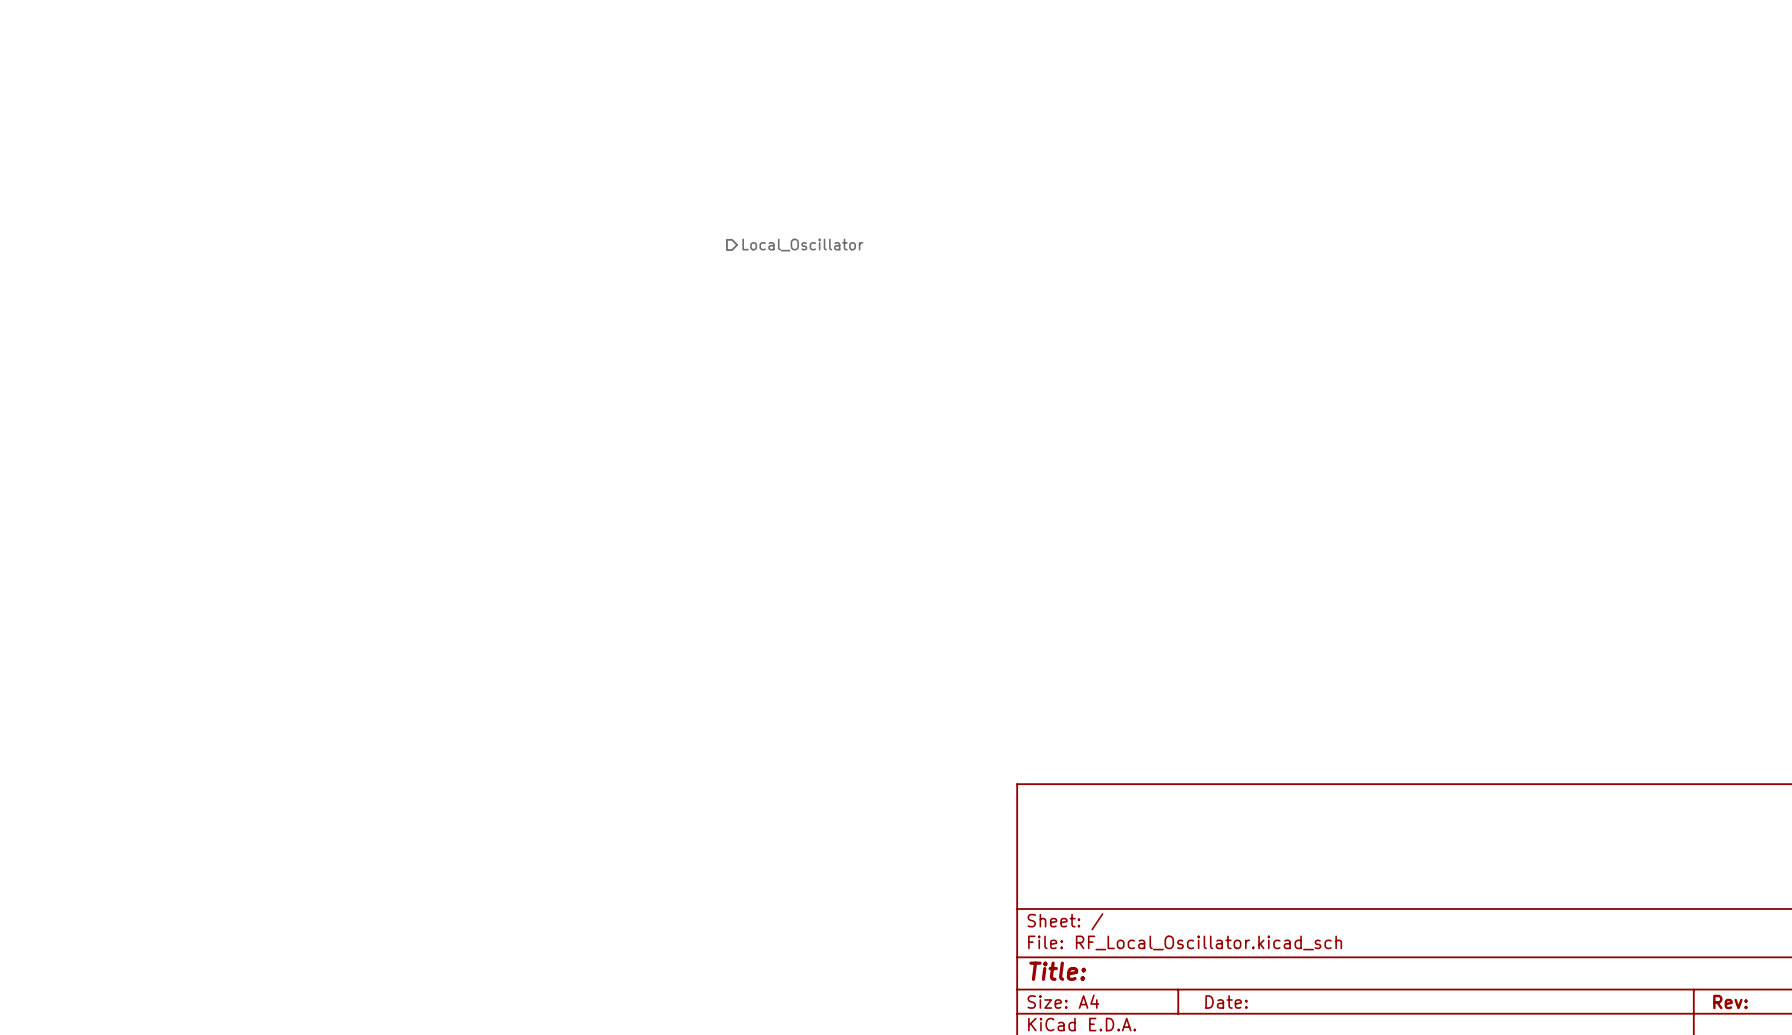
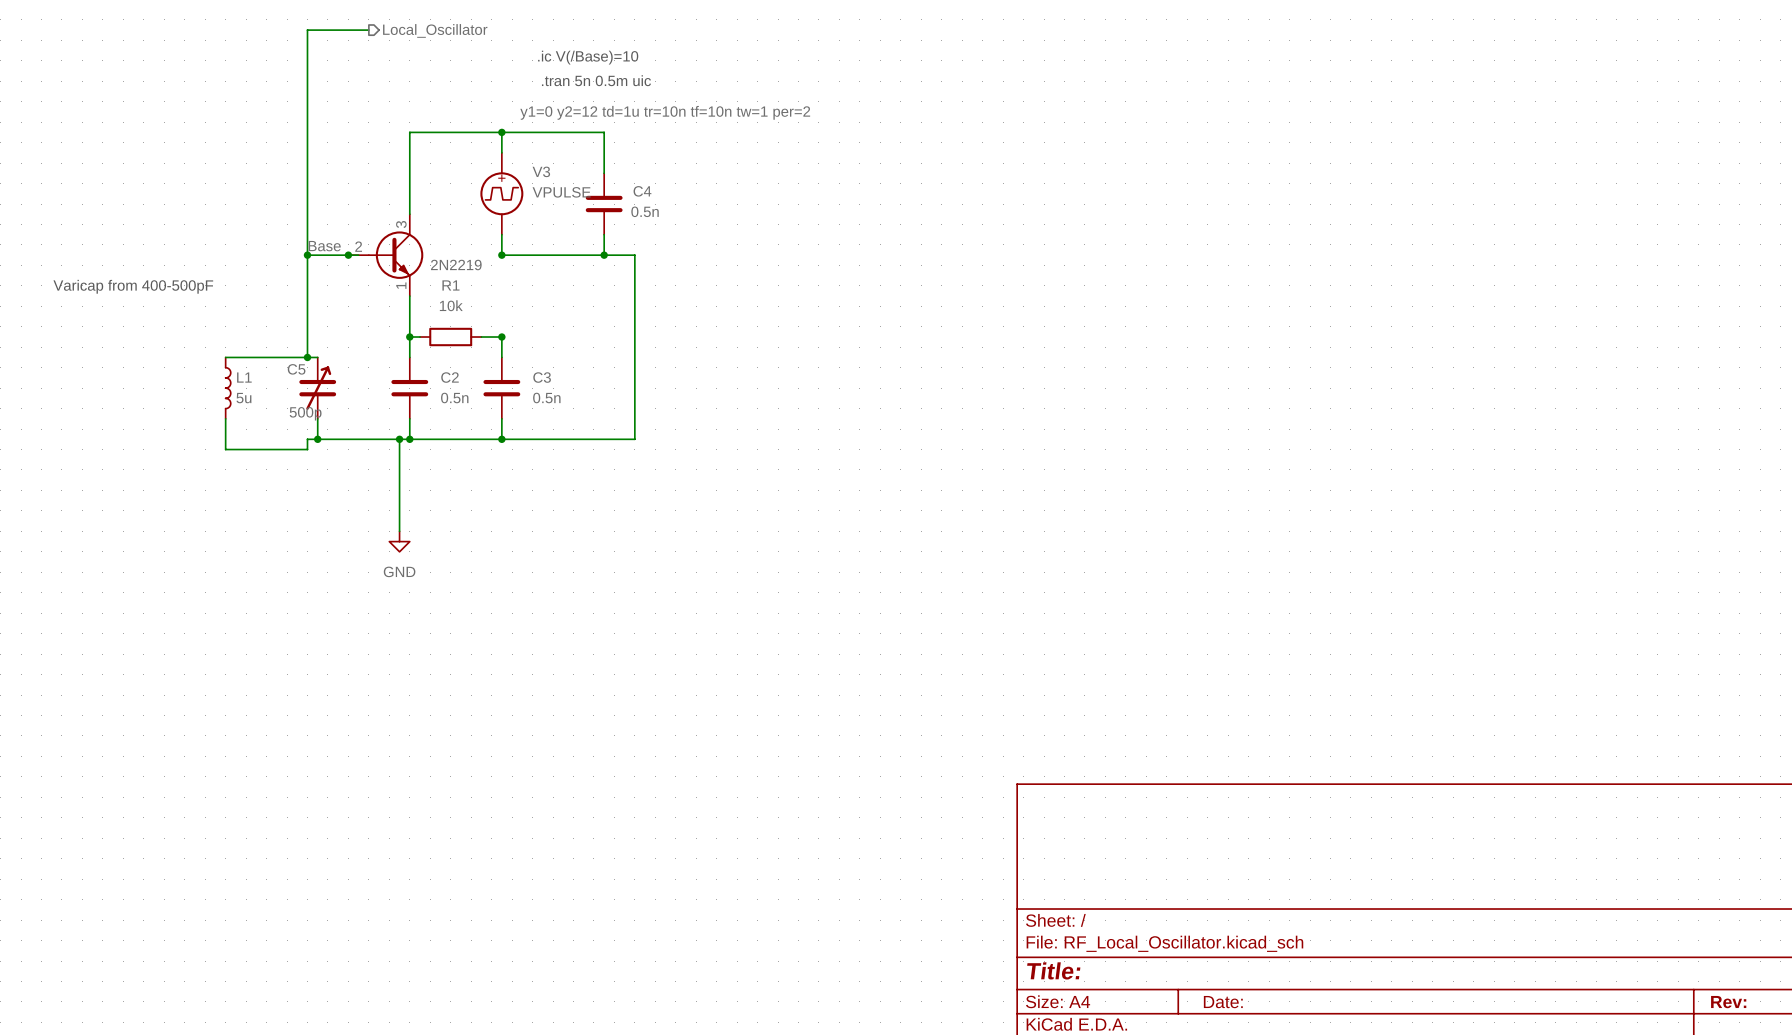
wire: none -> (368, 30) (307, 30) (307, 357)
hierarchical label: none -> Local_Oscillator (435, 30)
text: none -> .ic V(/Base)=10 (588, 57)
text: none -> .tran 5n 0.5m uic (596, 80)
wire: none -> (501, 132) (501, 152)
junction: none -> (501, 132)
wire: none -> (604, 173) (604, 132) (409, 132) (409, 214)
V3: none -> VPULSE (501, 193)
C4: none -> 0.5n (604, 204)
wire: none -> (501, 234) (501, 255) (634, 255) (634, 439) (307, 439) (307, 449) (225, 449) (225, 418)
wire: none -> (604, 234) (604, 255)
hierarchical label: Local_Oscillator (802, 245) -> none
label: none -> Base (324, 246)
wire: none -> (307, 255) (358, 255)
junction: none -> (307, 255)
junction: none -> (348, 255)
part: none -> 2N2219 (385, 255)
junction: none -> (501, 255)
junction: none -> (604, 255)
text: none -> Varicap from 400-500pF (133, 286)
wire: none -> (409, 296) (409, 357)
wire: none -> (409, 337) (420, 337)
junction: none -> (409, 337)
R1: none -> 10k (450, 337)
wire: none -> (481, 337) (501, 337) (501, 357)
junction: none -> (501, 337)
wire: none -> (225, 357) (317, 357)
junction: none -> (307, 357)
L1: none -> 5u (228, 388)
C5: none -> 500p (317, 388)
C2: none -> 0.5n (409, 388)
C3: none -> 0.5n (501, 388)
wire: none -> (317, 418) (317, 439)
wire: none -> (409, 418) (409, 439)
wire: none -> (501, 418) (501, 439)
junction: none -> (317, 439)
wire: none -> (399, 439) (399, 531)
junction: none -> (399, 439)
junction: none -> (409, 439)
junction: none -> (501, 439)
power symbol: none -> GND (399, 541)

